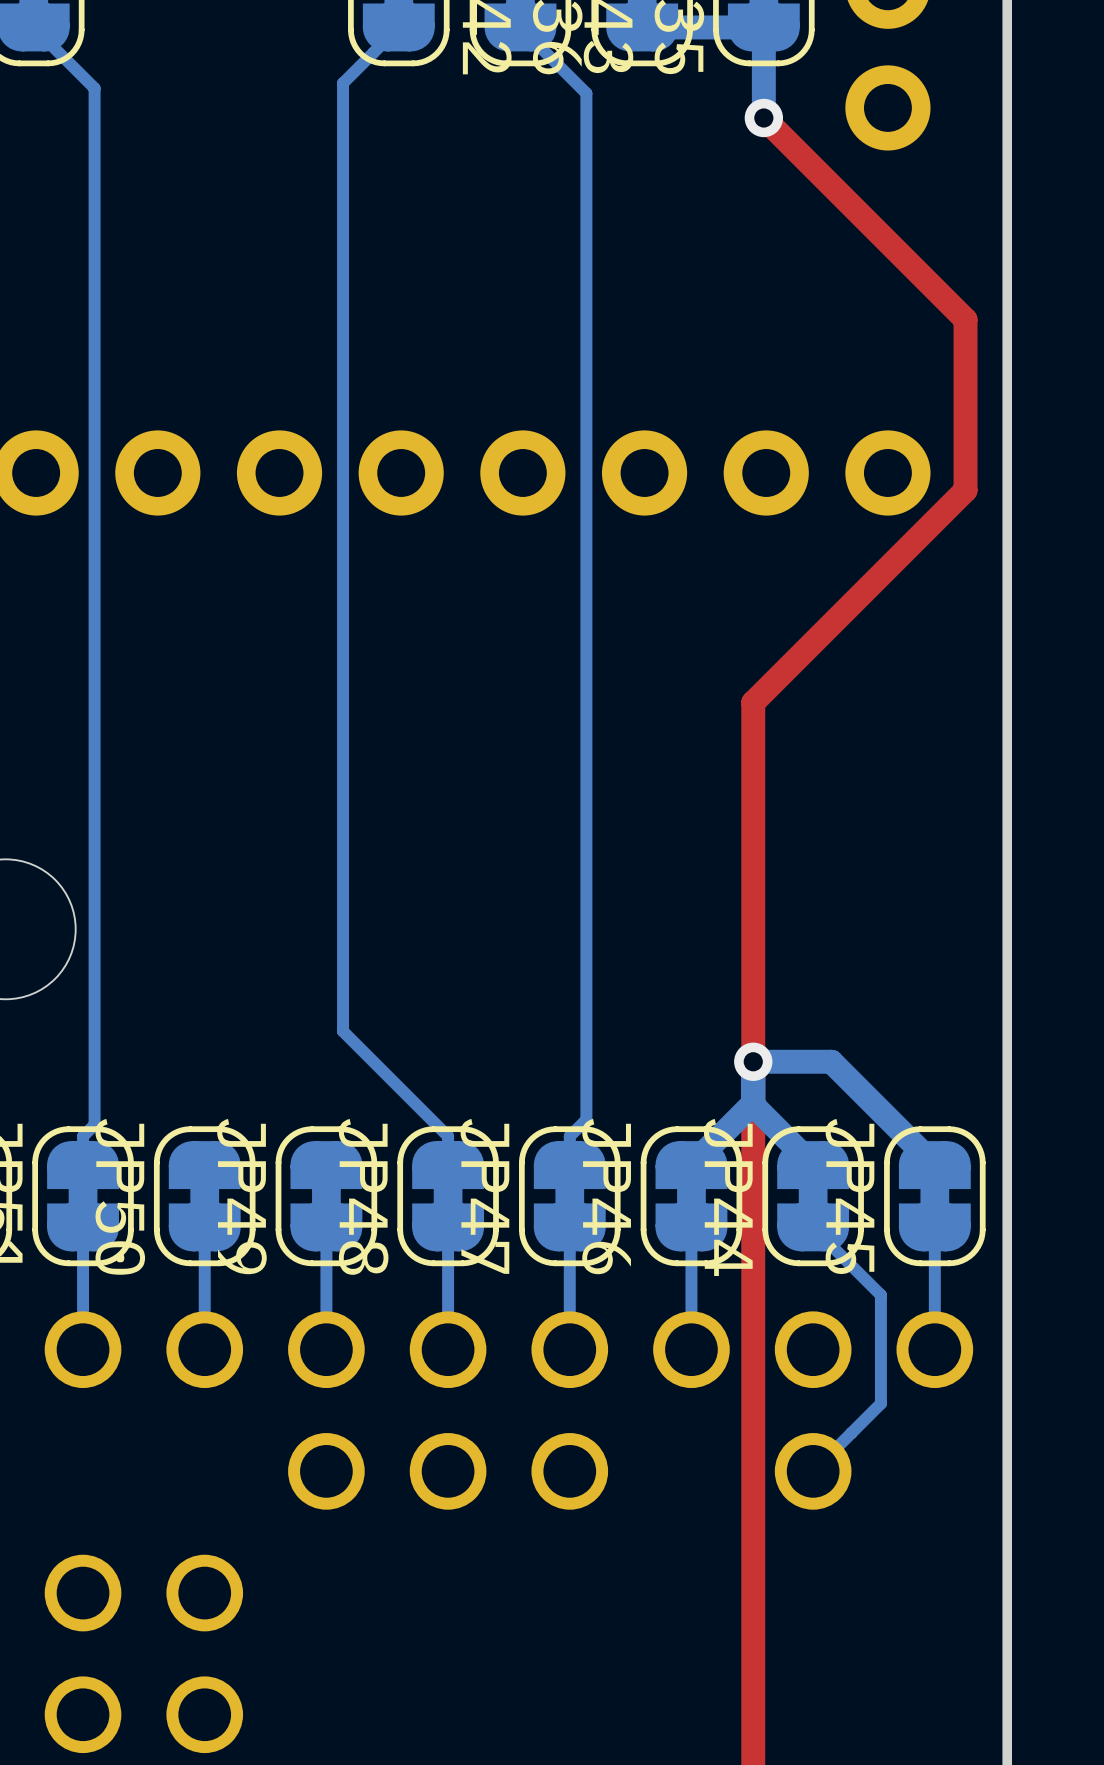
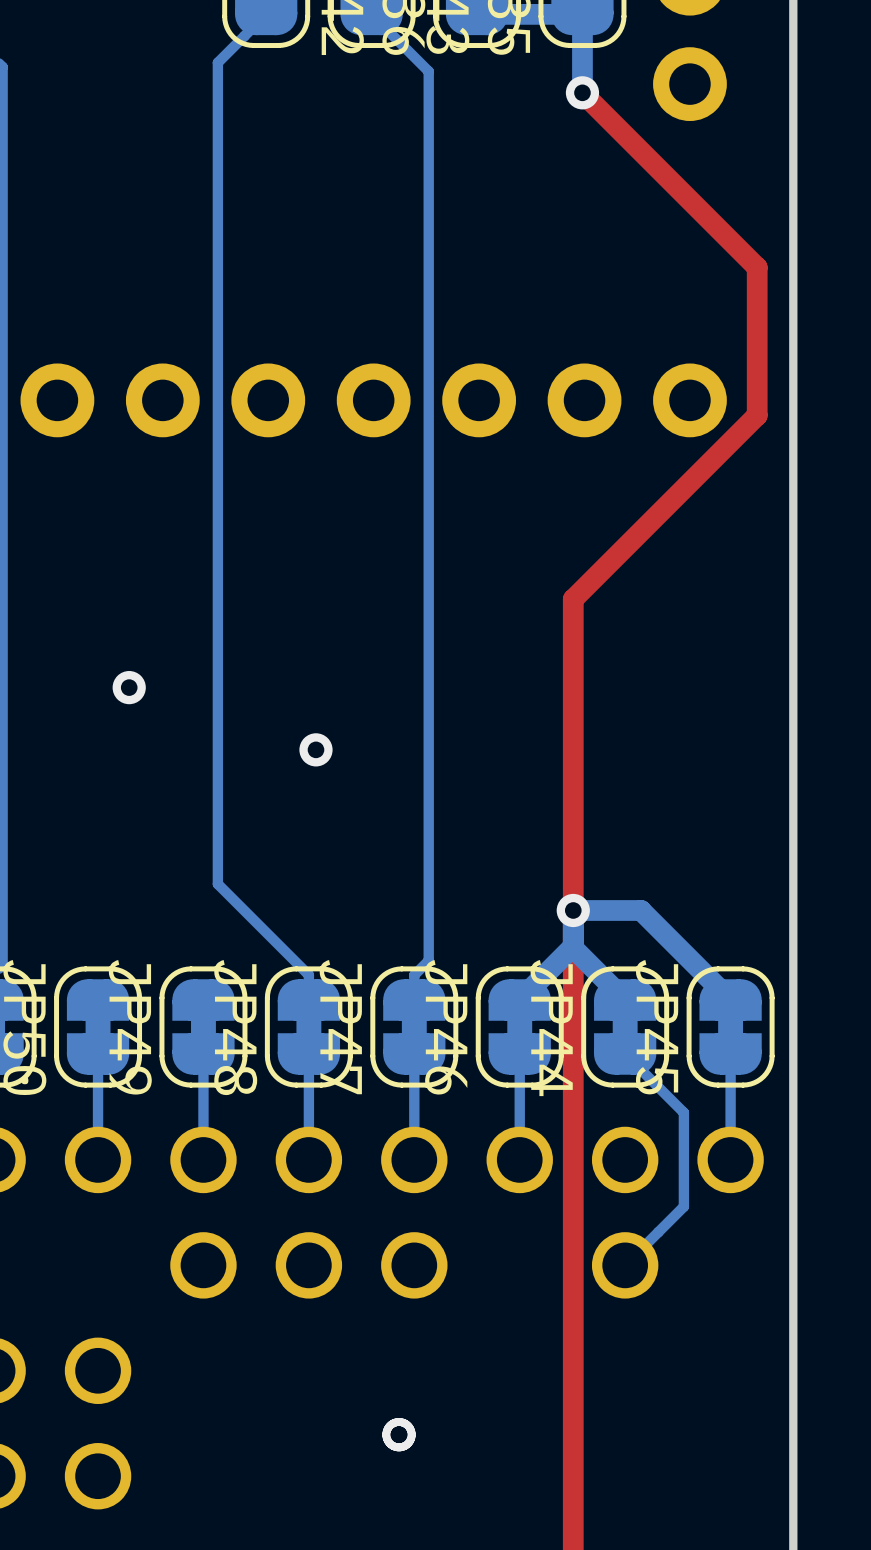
via: none -> (129, 687)
via: none -> (315, 749)
via: none -> (399, 1434)

